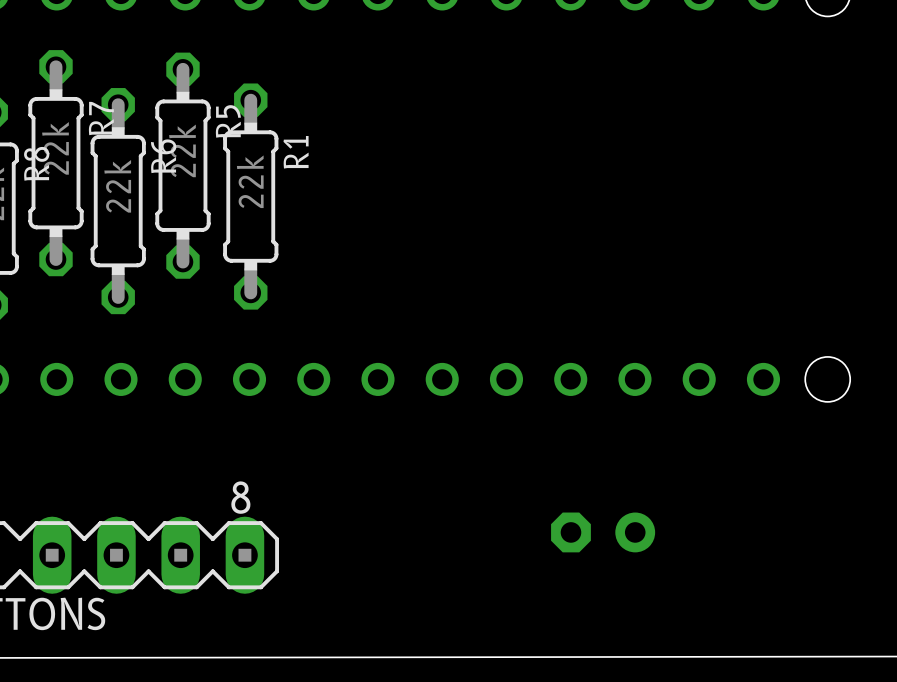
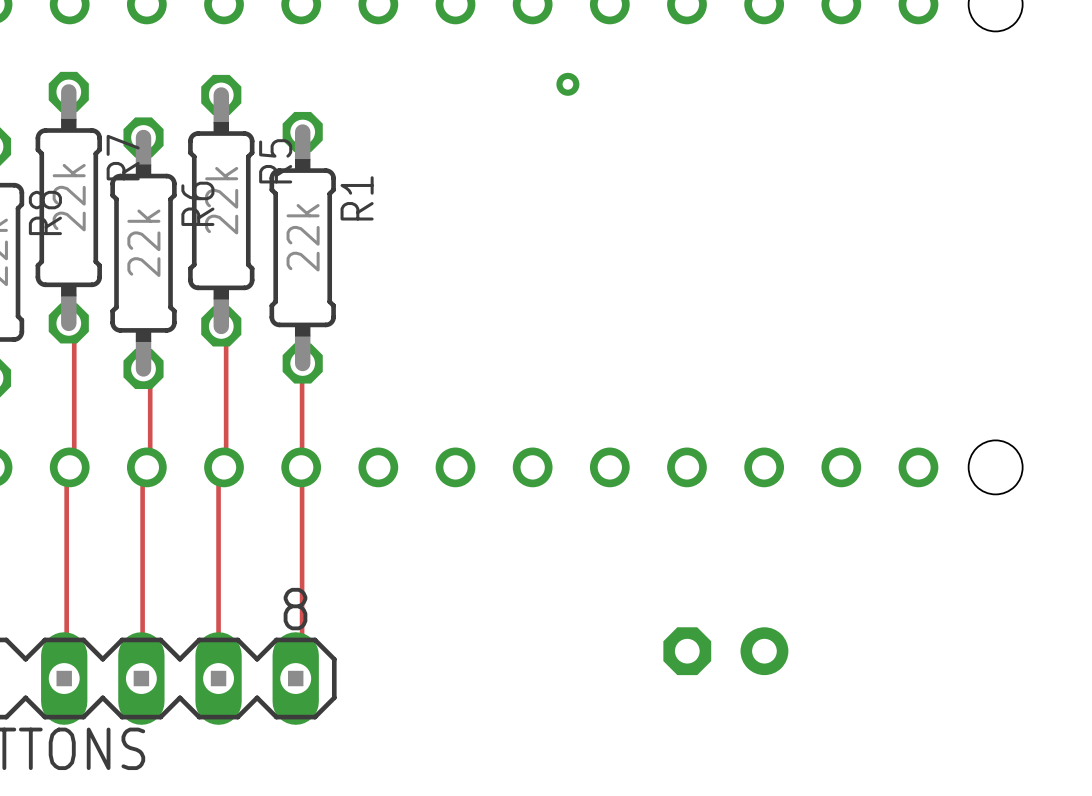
via: none -> (567, 84)
track: none -> (68, 323) (74, 327) (74, 464) (66, 471) (66, 676) (64, 678)
track: none -> (221, 326) (226, 327) (226, 464) (218, 471) (218, 678)
track: none -> (302, 363) (302, 676) (295, 678)
track: none -> (143, 368) (150, 372) (150, 464) (142, 471) (141, 678)

